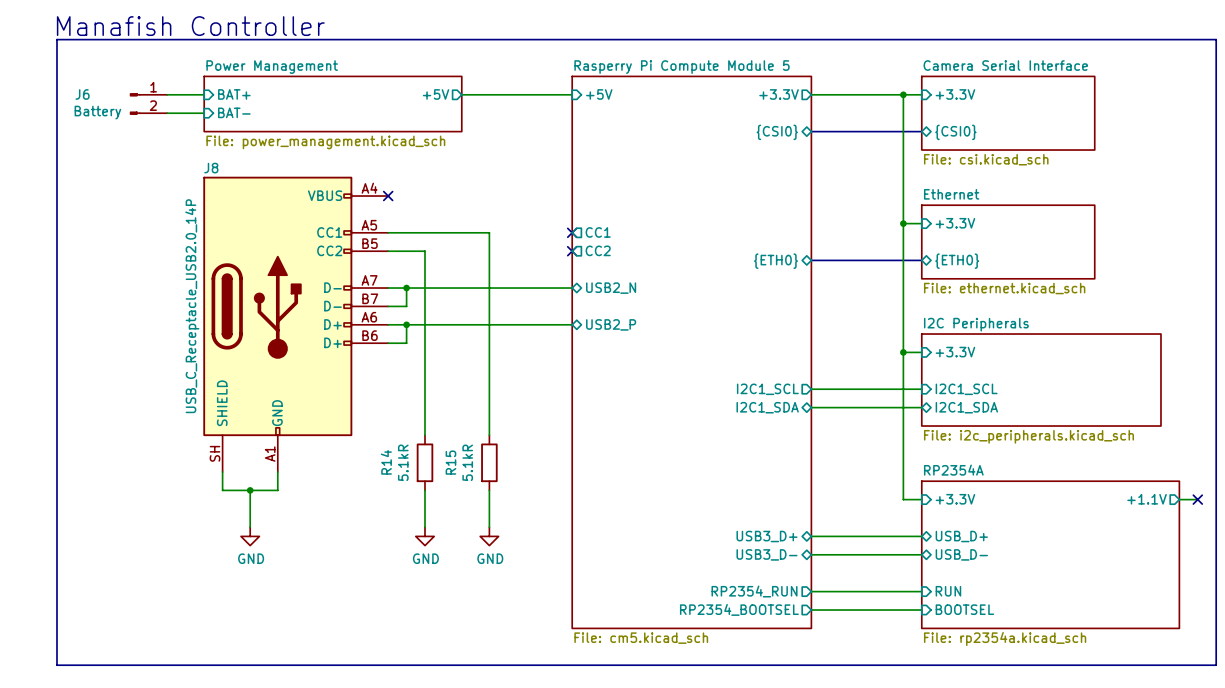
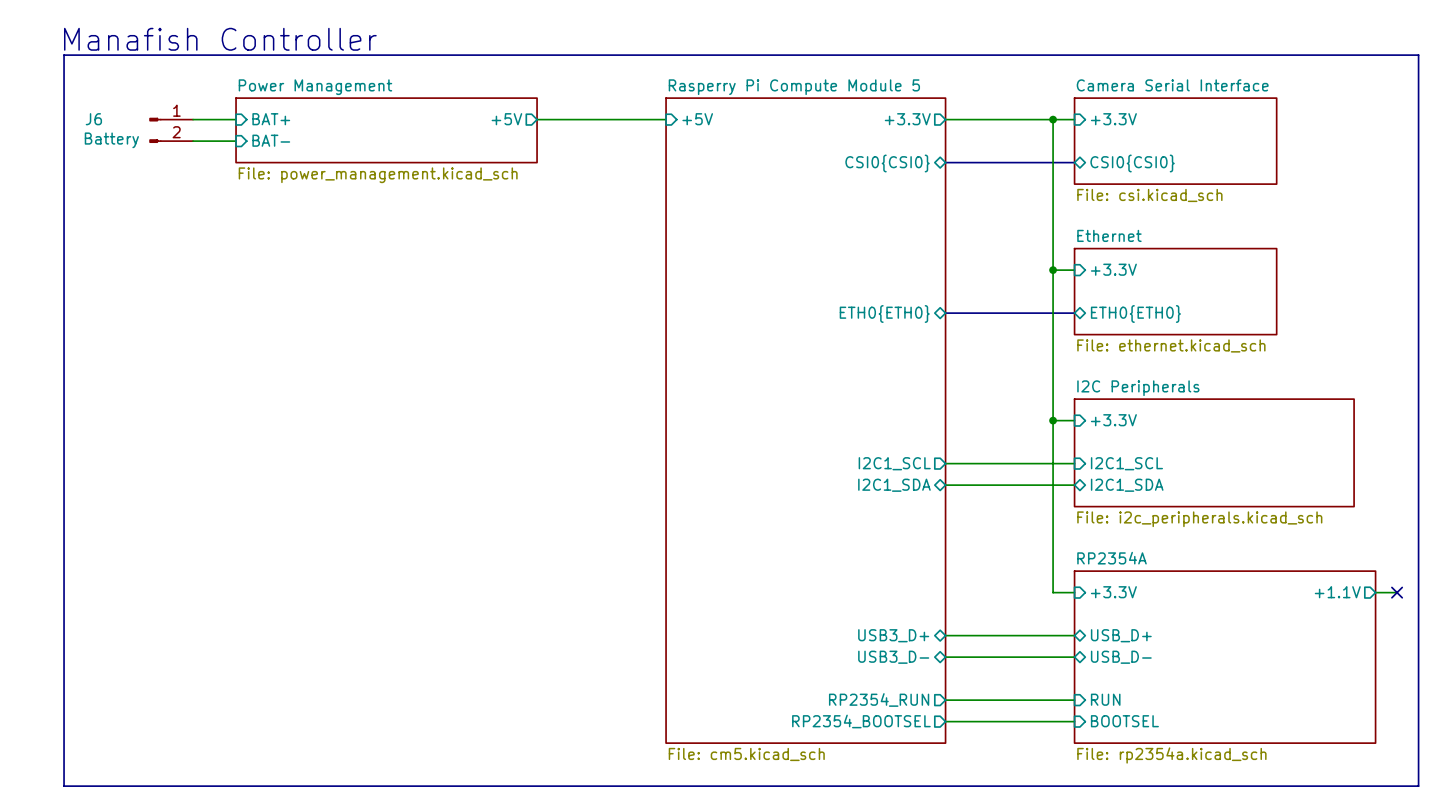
sheet pin: {CSI0} (777, 132) -> CSI0{CSI0} (887, 163)
sheet pin: {CSI0} (955, 132) -> CSI0{CSI0} (1132, 163)
no-connect mark: (388, 196) -> none
wire: (388, 232) (489, 232) (489, 435) -> none
no-connect mark: (572, 232) -> none
sheet pin: CC1 (598, 232) -> none
sheet pin: CC2 (598, 250) -> none
wire: (388, 251) (424, 251) (424, 435) -> none
no-connect mark: (572, 251) -> none
sheet pin: {ETH0} (775, 261) -> ETH0{ETH0} (884, 313)
sheet pin: {ETH0} (957, 261) -> ETH0{ETH0} (1135, 313)
wire: (388, 288) (572, 288) -> none
wire: (406, 288) (406, 306) (388, 306) -> none
junction: (406, 288) -> none
sheet pin: USB2_N (611, 288) -> none
J8: USB_C_Receptacle_USB2.0_14P (295, 324) -> none
wire: (388, 324) (572, 324) -> none
wire: (406, 324) (406, 343) (388, 343) -> none
junction: (406, 324) -> none
sheet pin: USB2_P (611, 324) -> none
R14: 5.1kR (424, 462) -> none
R15: 5.1kR (489, 462) -> none
wire: (222, 472) (222, 490) (277, 490) (277, 472) -> none
wire: (250, 490) (250, 527) -> none
junction: (250, 490) -> none
wire: (424, 490) (424, 527) -> none
wire: (489, 490) (489, 527) -> none
power symbol: GND (250, 536) -> none
power symbol: GND (424, 536) -> none
power symbol: GND (489, 536) -> none

